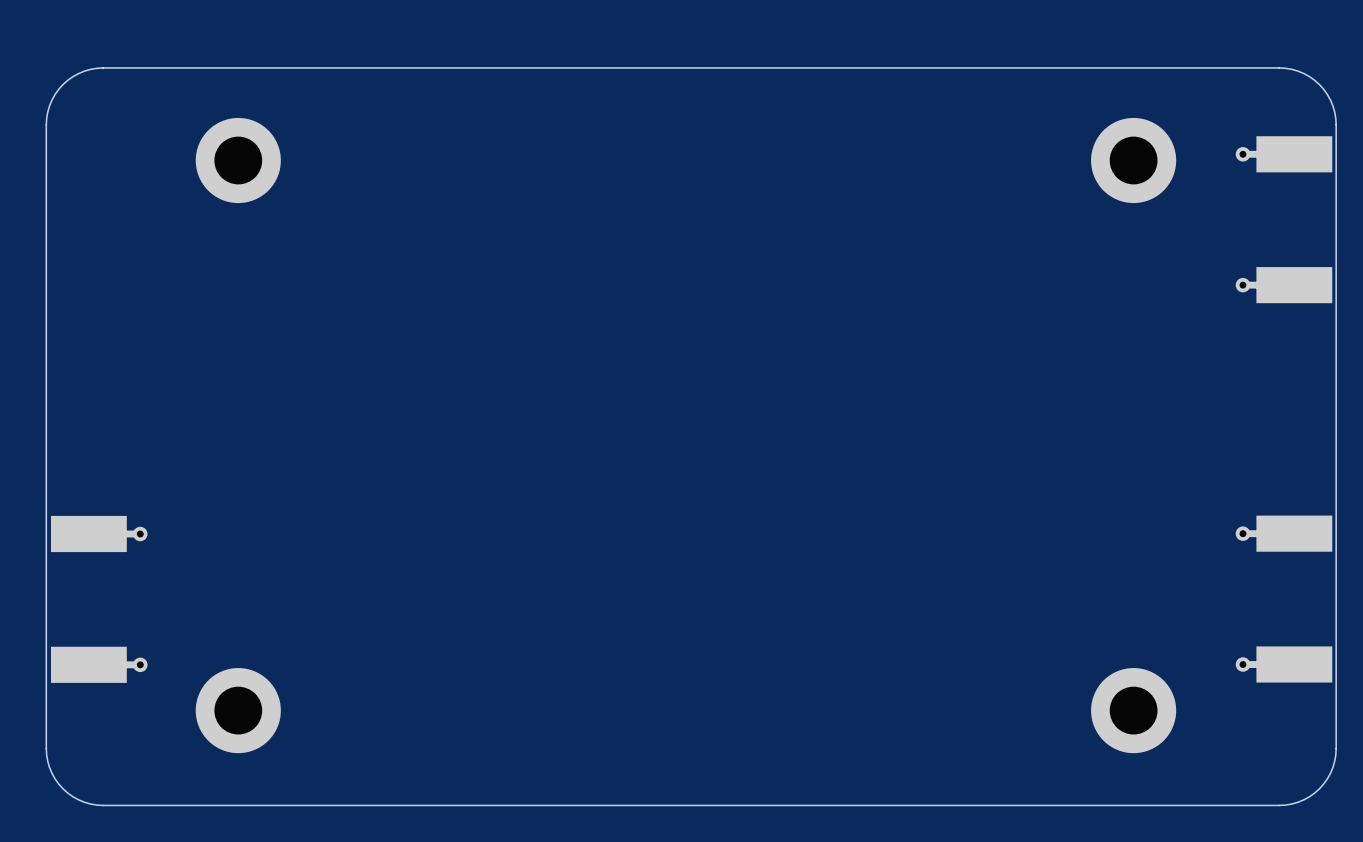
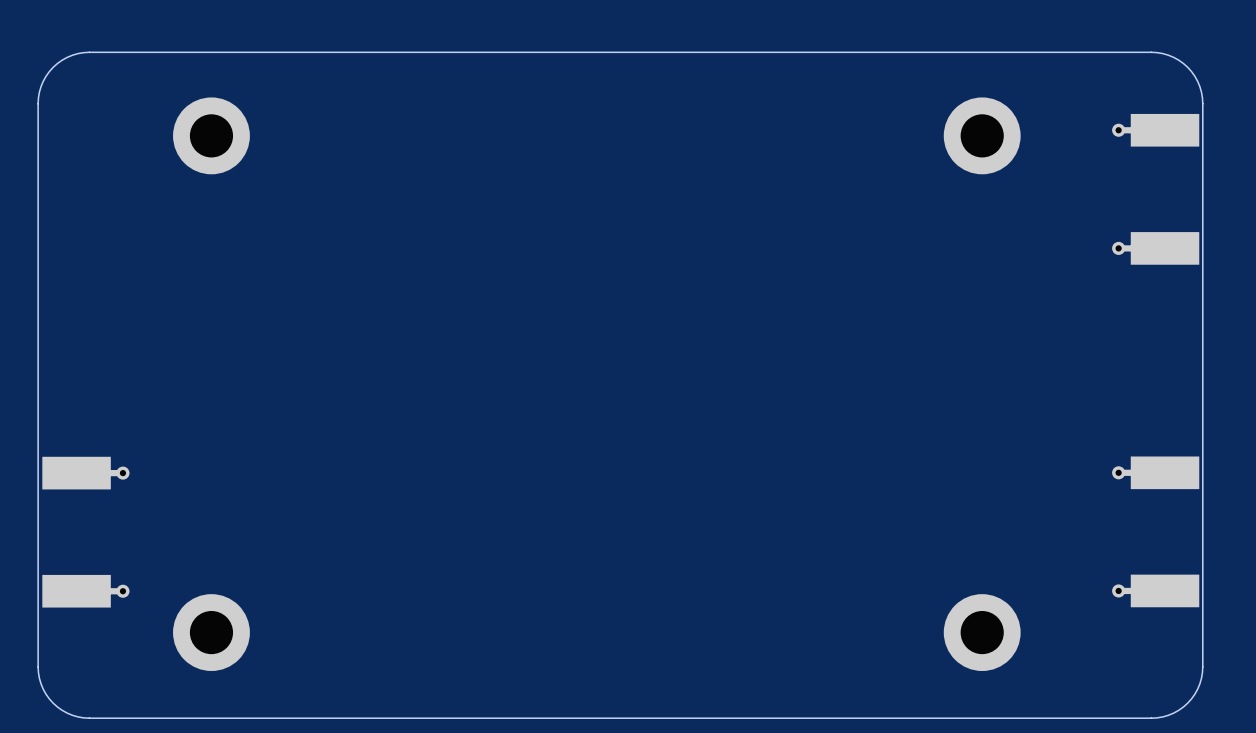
part position: (1133, 160) -> (982, 135)
part position: (1133, 710) -> (982, 632)

